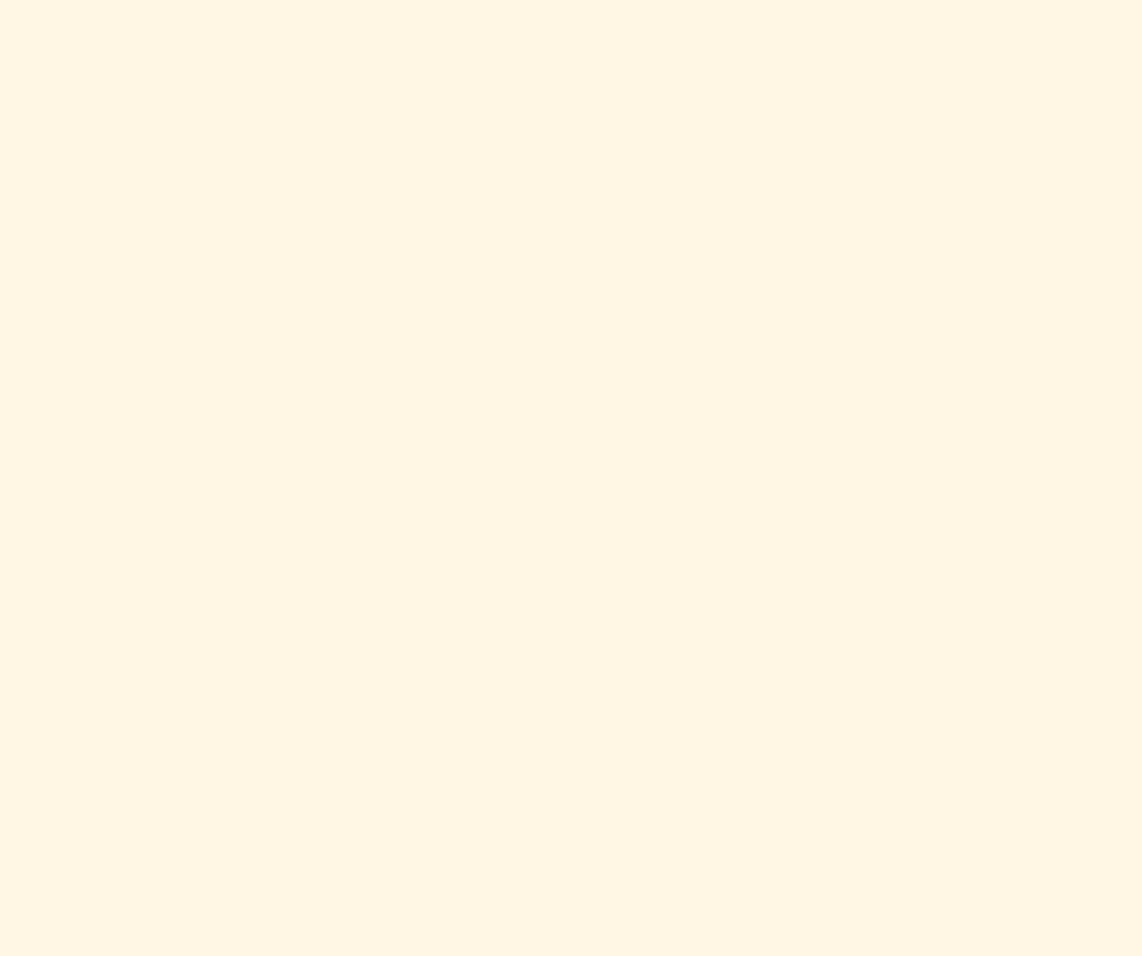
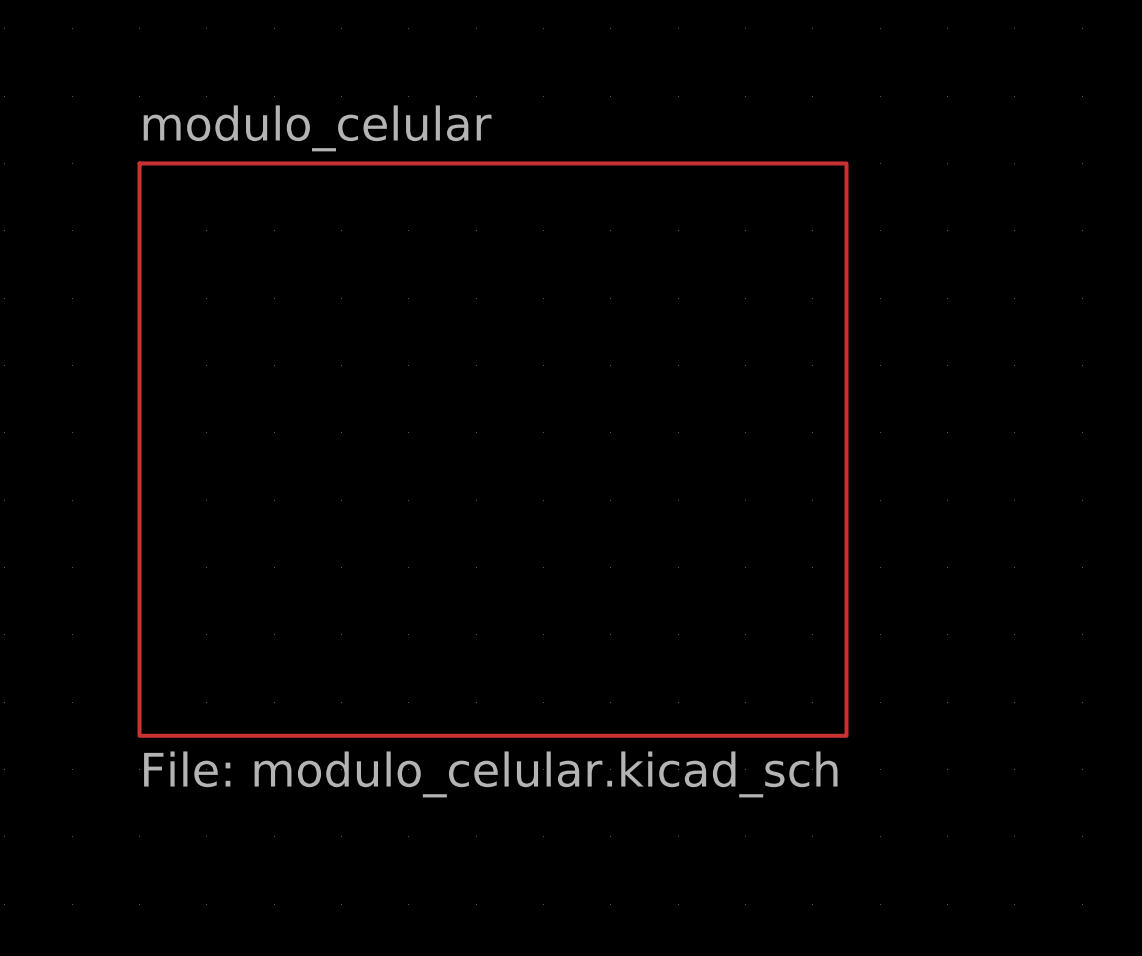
sheet modulo_celular: none -> File: modulo_celular.kicad_sch (493, 449)

